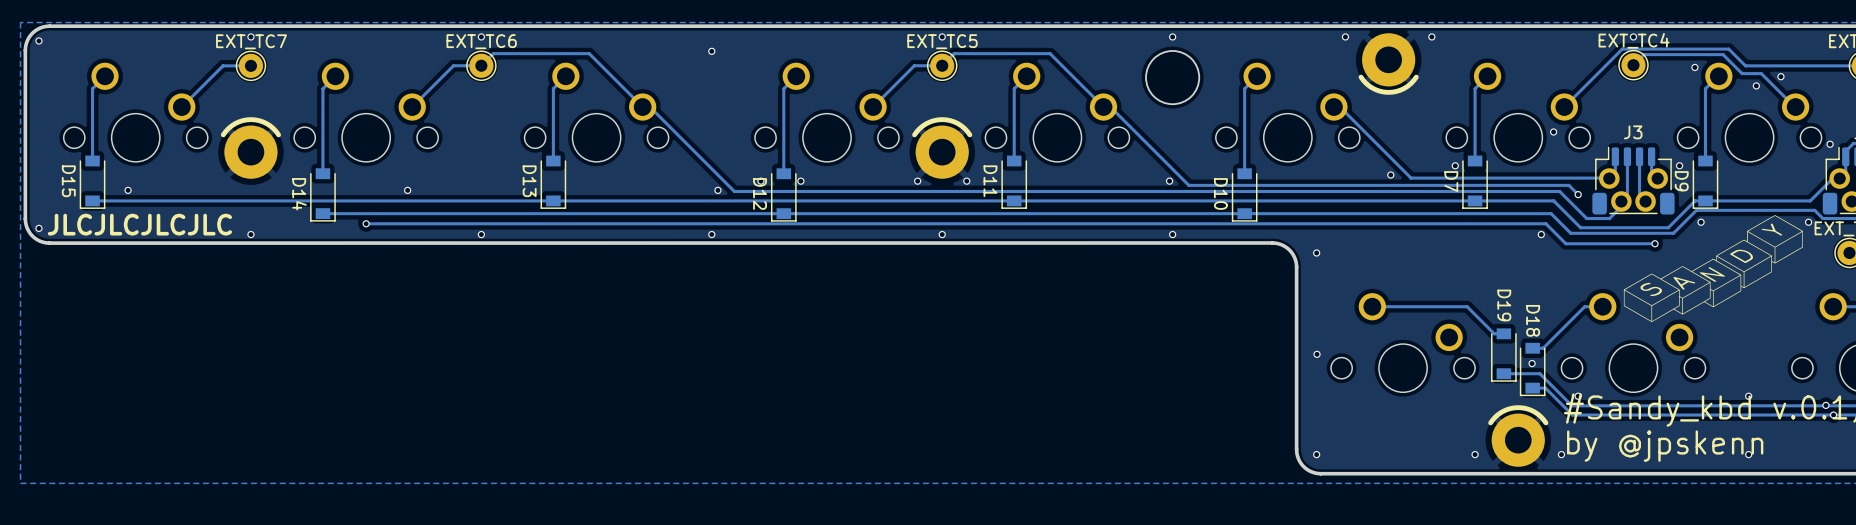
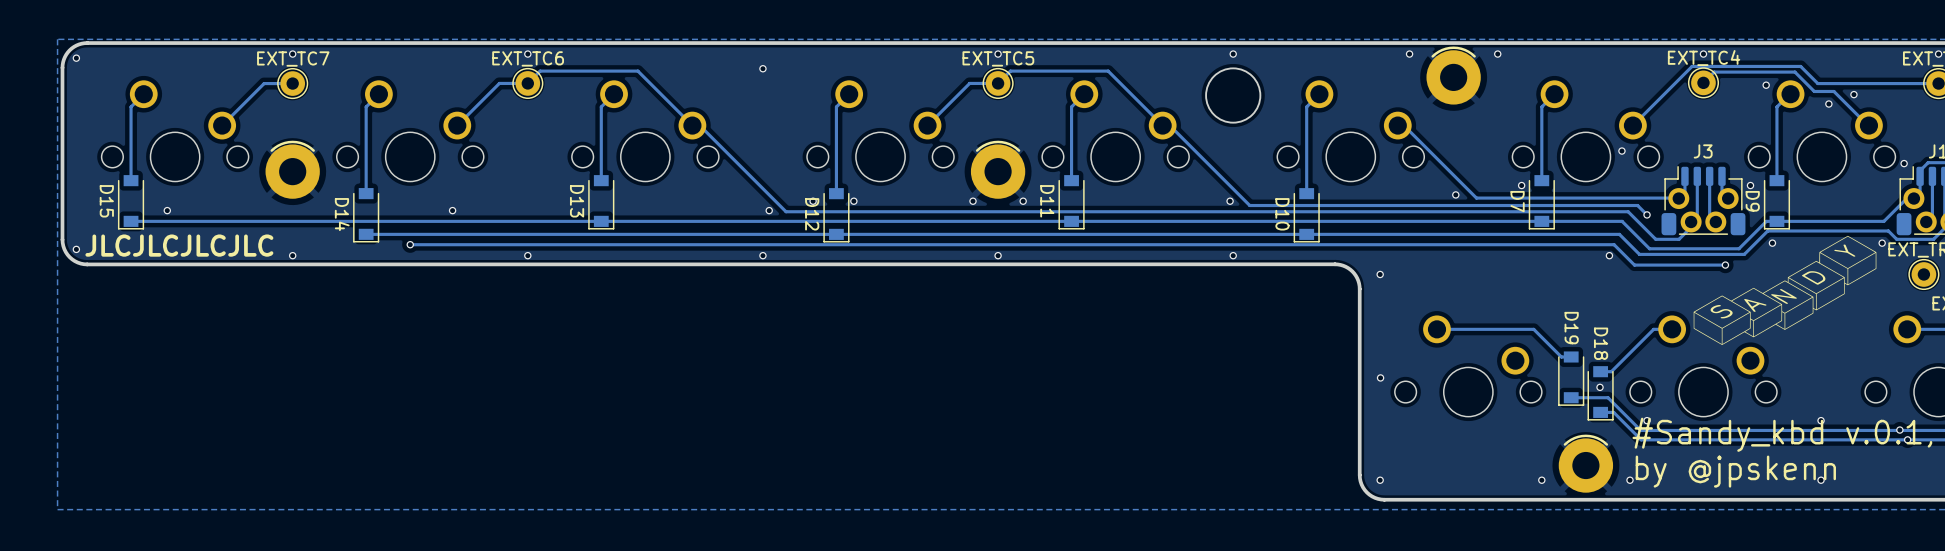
part footprint: [1358, 33, 1419, 95] -> [1426, 46, 1481, 105]
part footprint: [220, 117, 282, 179] -> [265, 140, 320, 199]
part footprint: [912, 117, 973, 179] -> [970, 140, 1026, 199]
part footprint: [1488, 405, 1549, 467] -> [1558, 434, 1614, 493]

